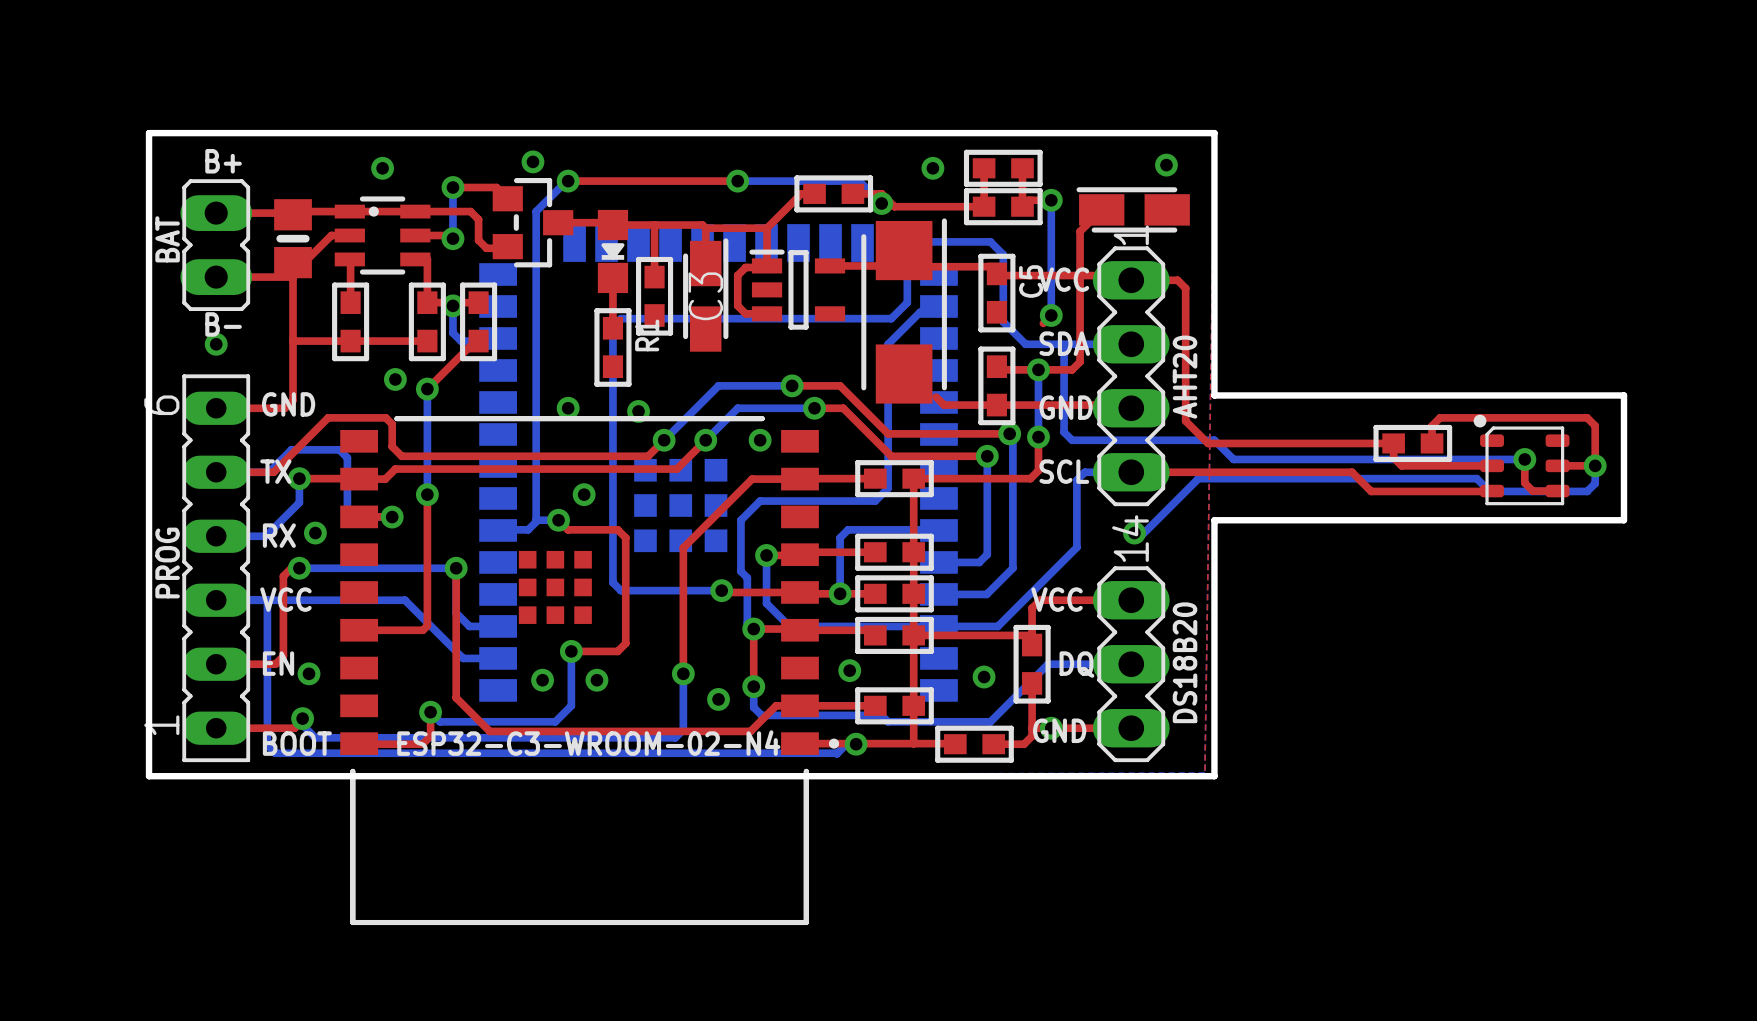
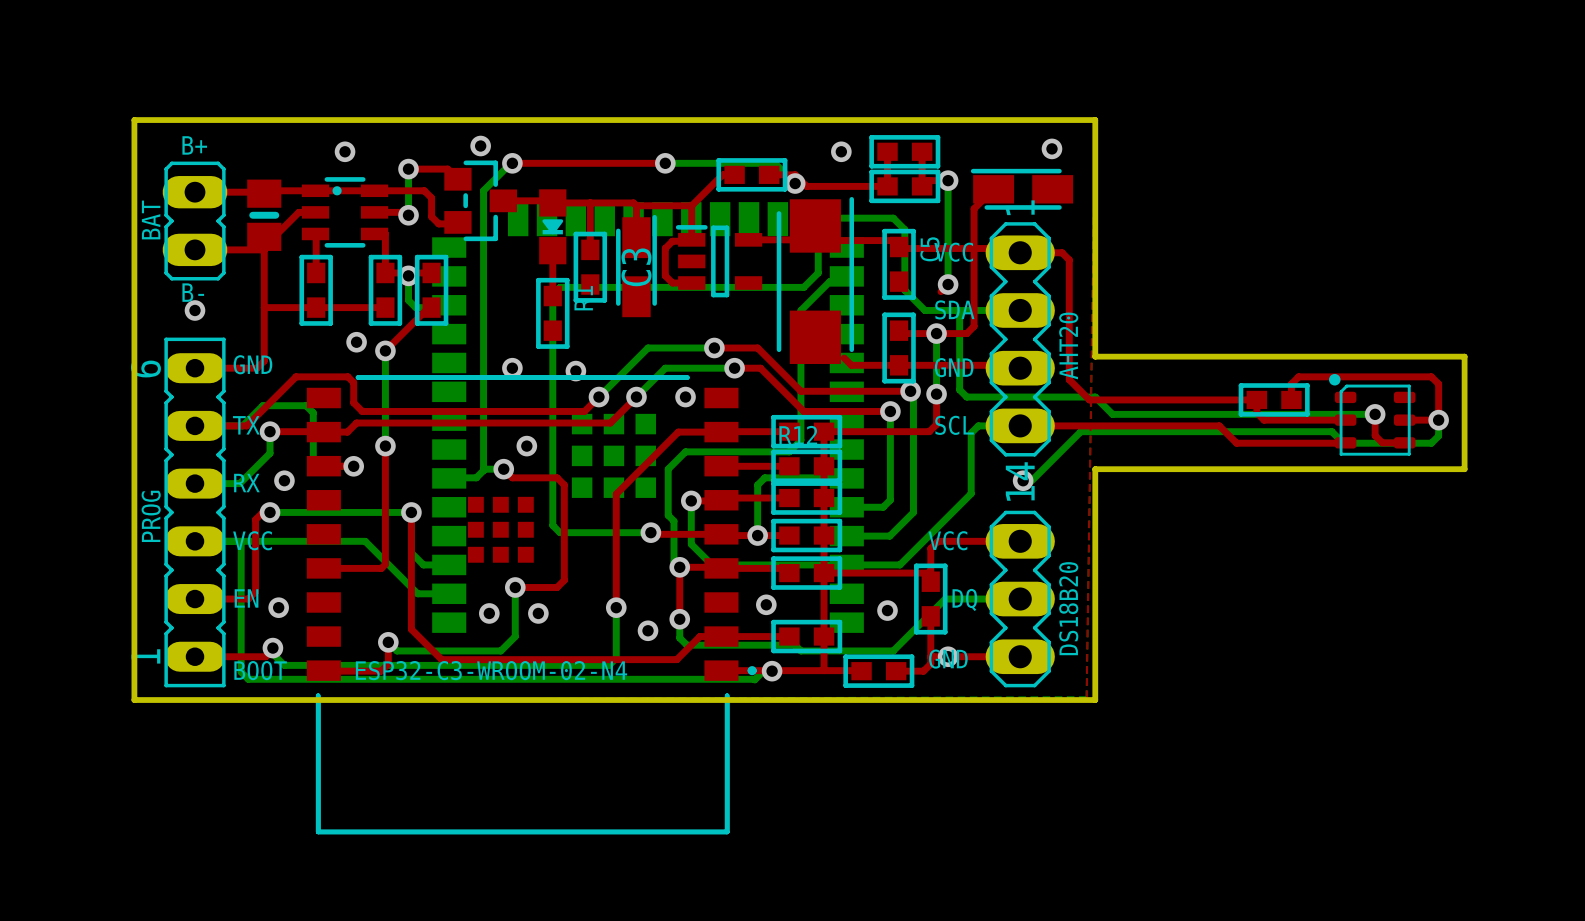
top track: none -> (721, 466) (789, 466)
R12: none -> (806, 466)

